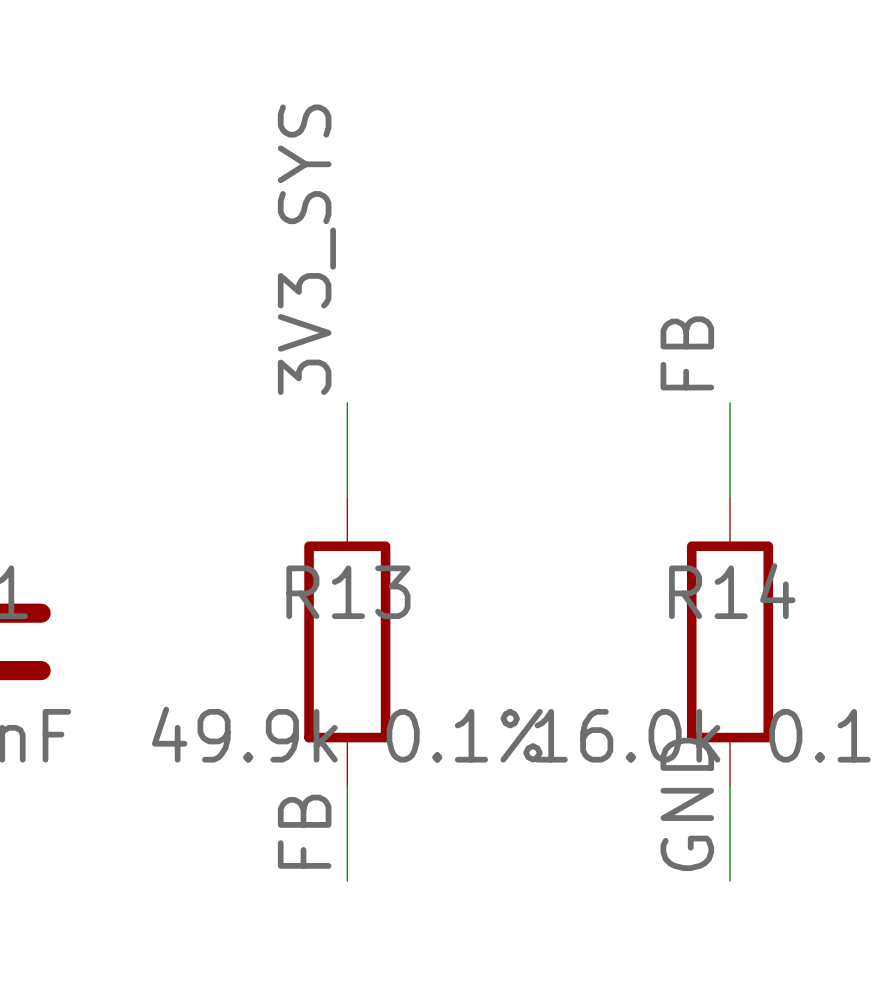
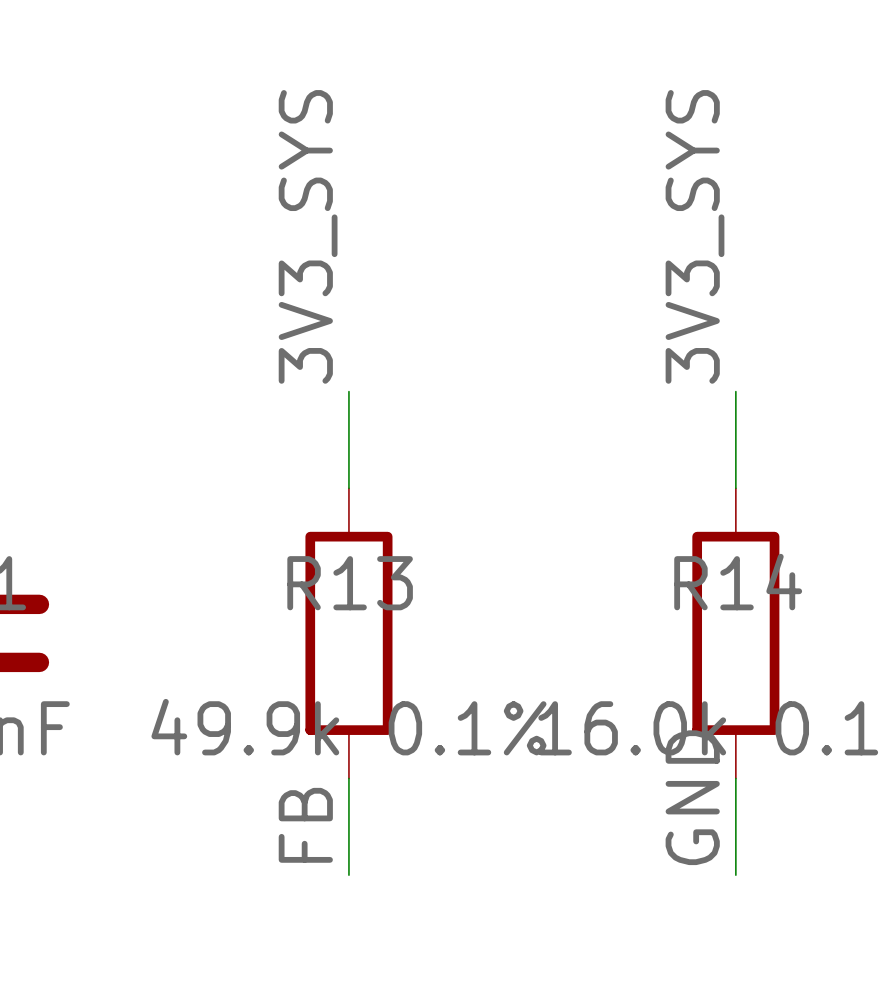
label: FB (687, 353) -> 3V3_SYS (695, 236)

